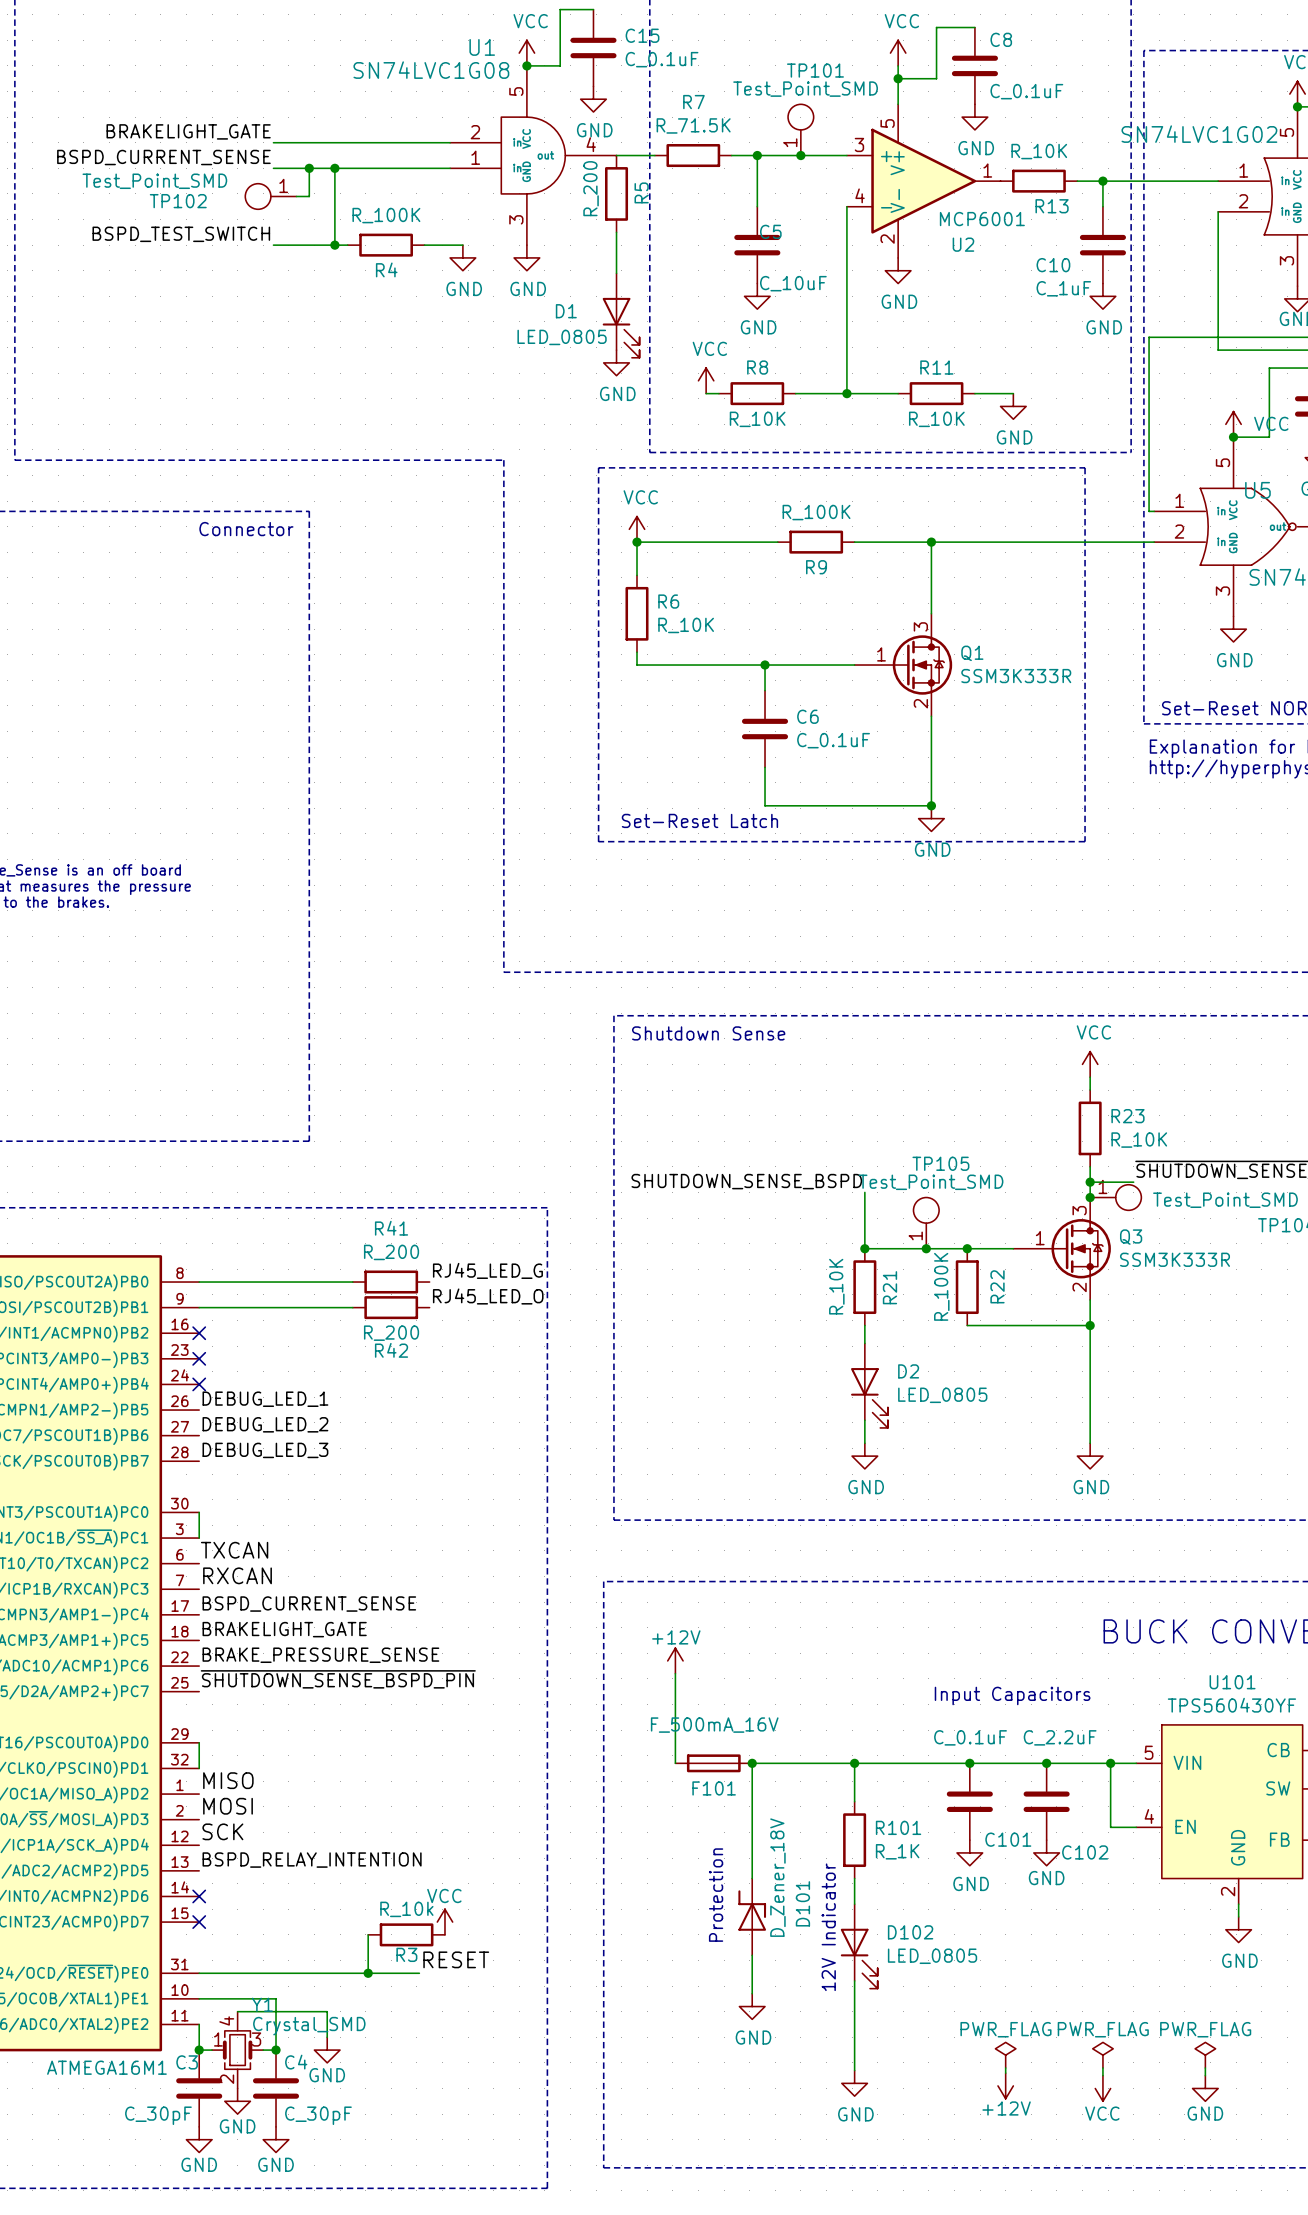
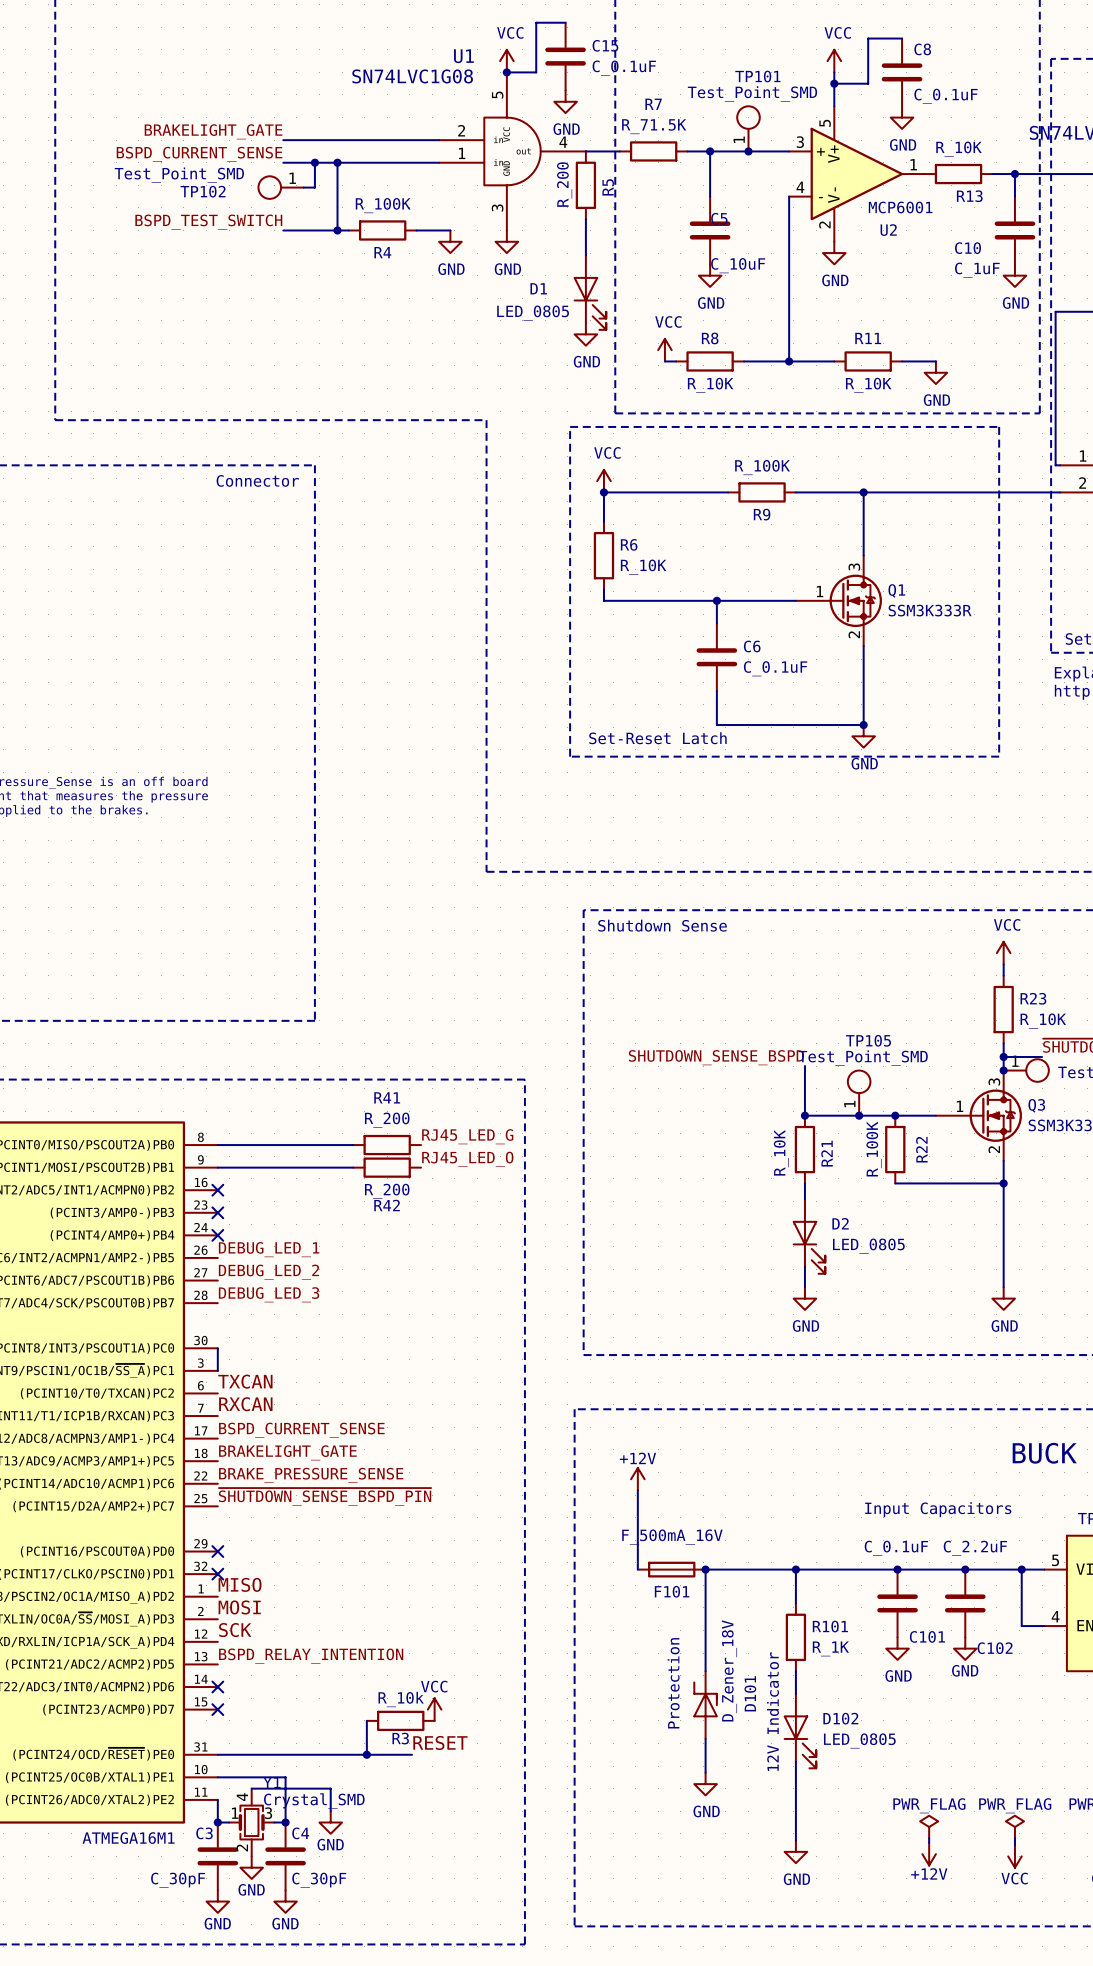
wire: (199, 1742) (199, 1768) -> none
no-connect mark: none -> (217, 1551)
no-connect mark: none -> (217, 1574)

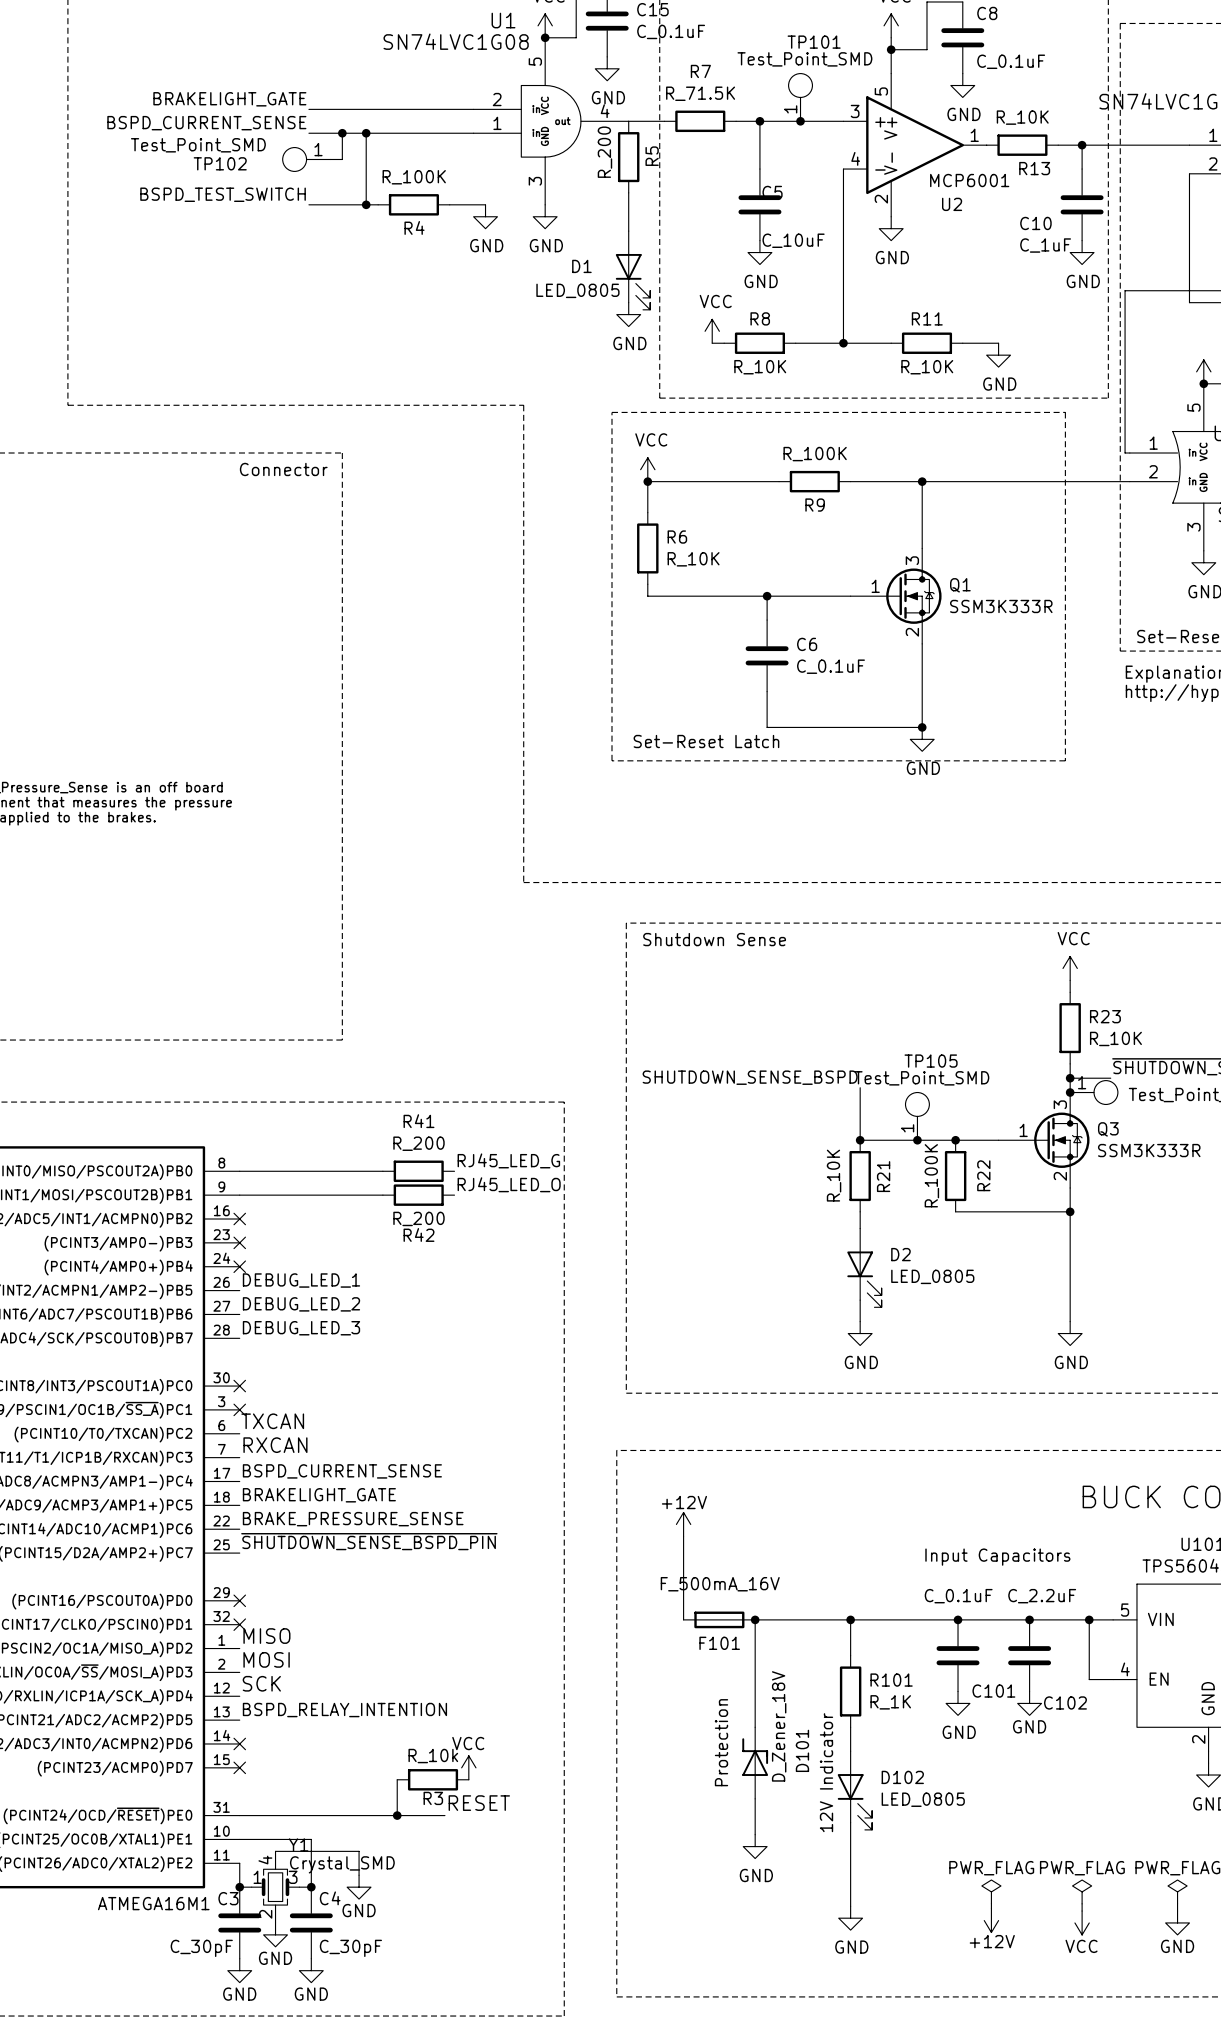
wire: (217, 1348) (217, 1370) -> none
no-connect mark: none -> (239, 1386)
no-connect mark: none -> (239, 1409)

